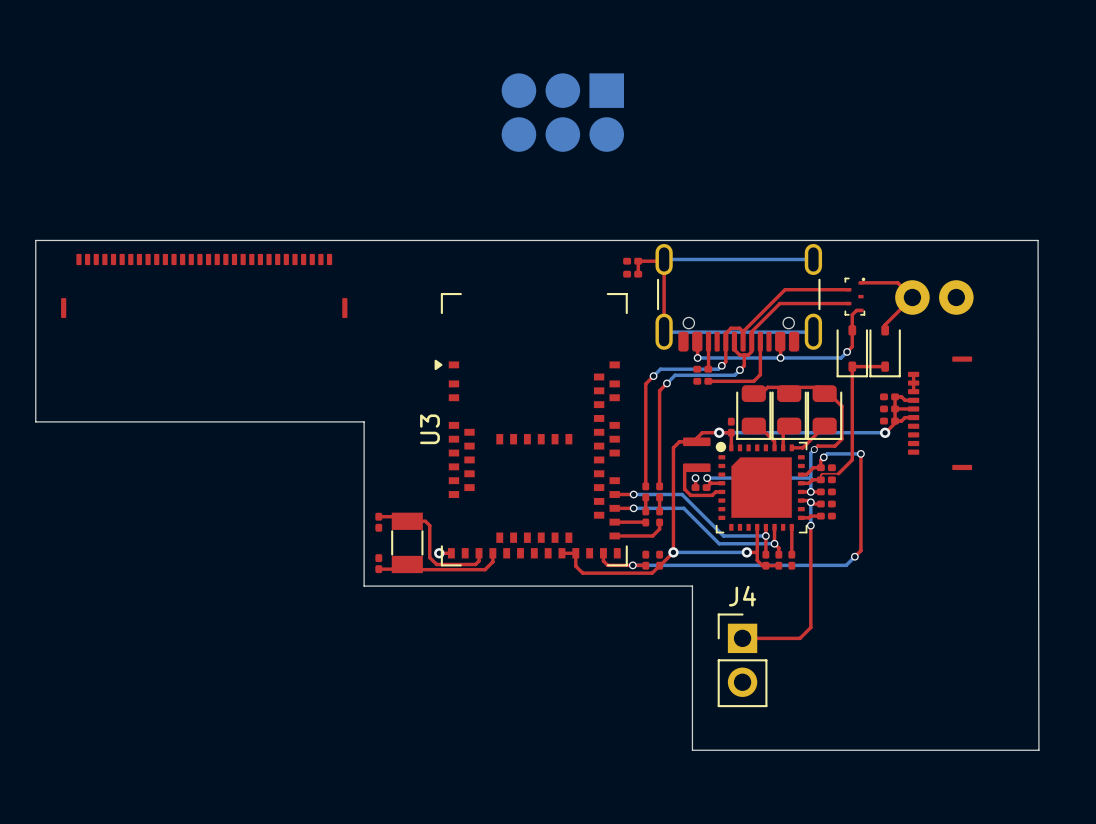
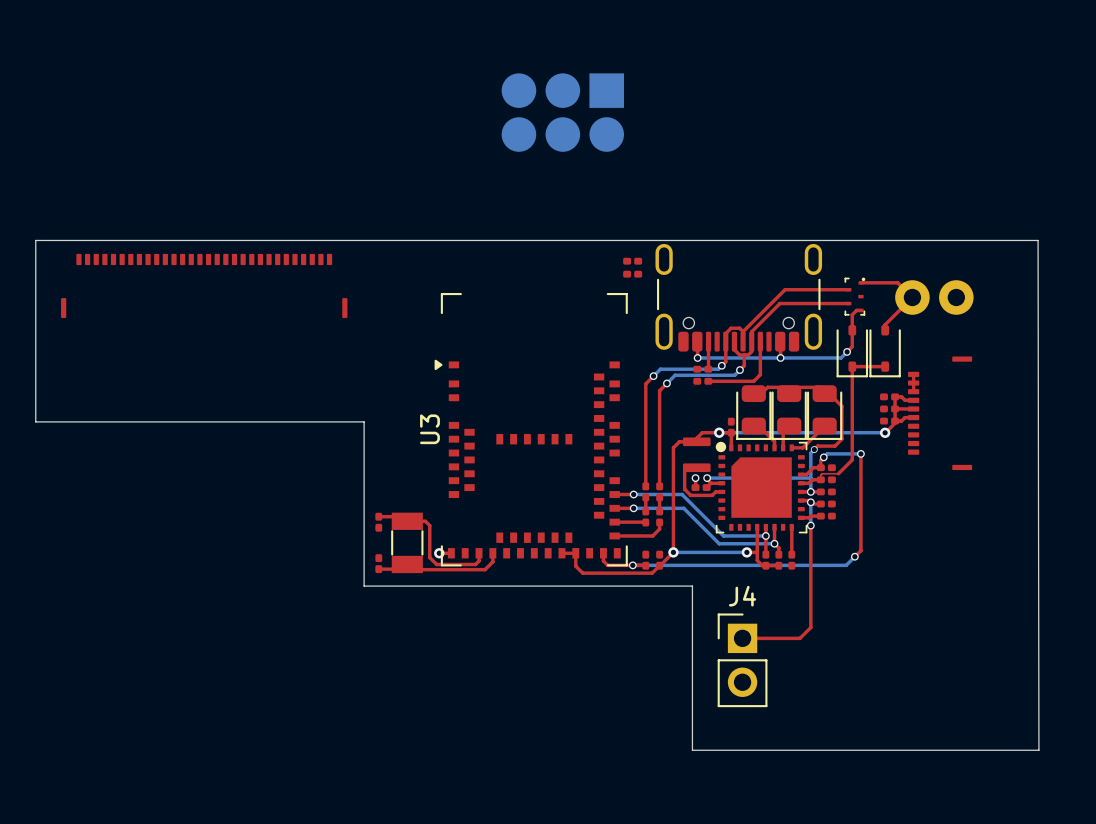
bottom track: (664, 259) (813, 259) -> none
top track: (662, 261) (638, 261) (638, 274) -> none
top track: (661, 262) (664, 259) (664, 331) -> none
bottom track: (664, 331) (813, 331) -> none

